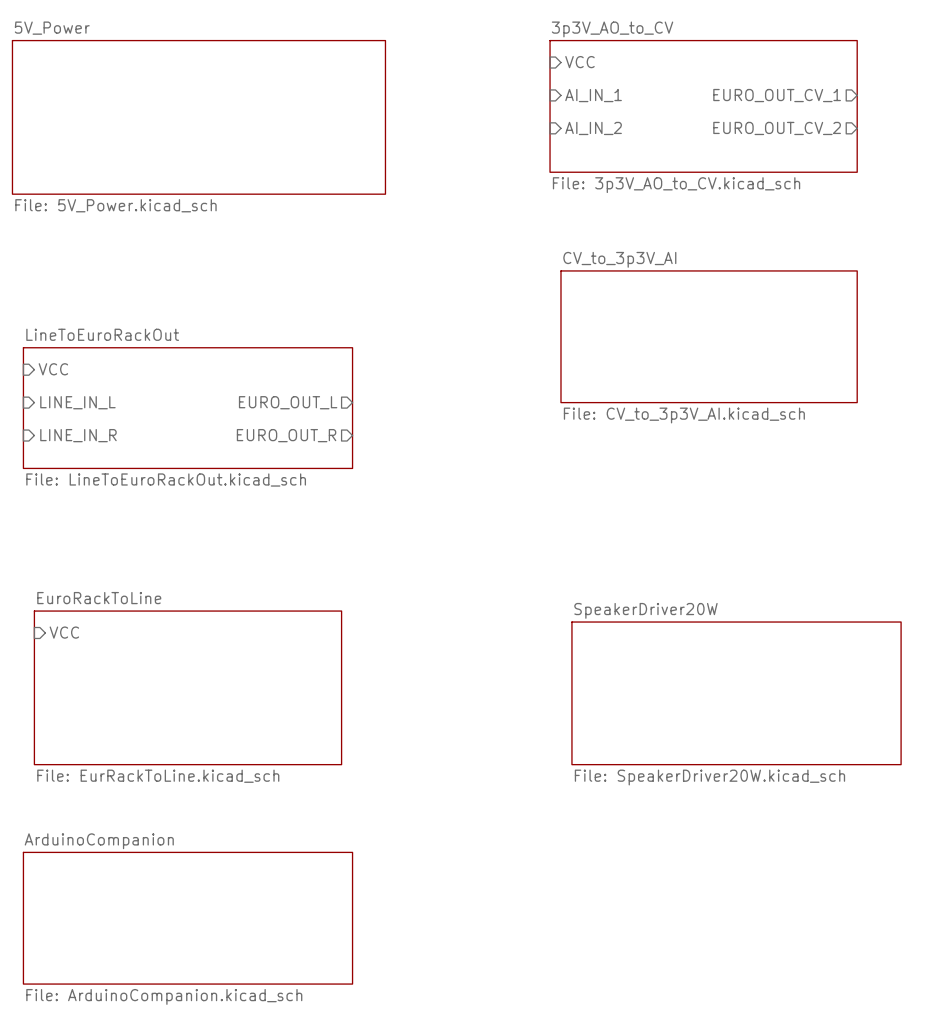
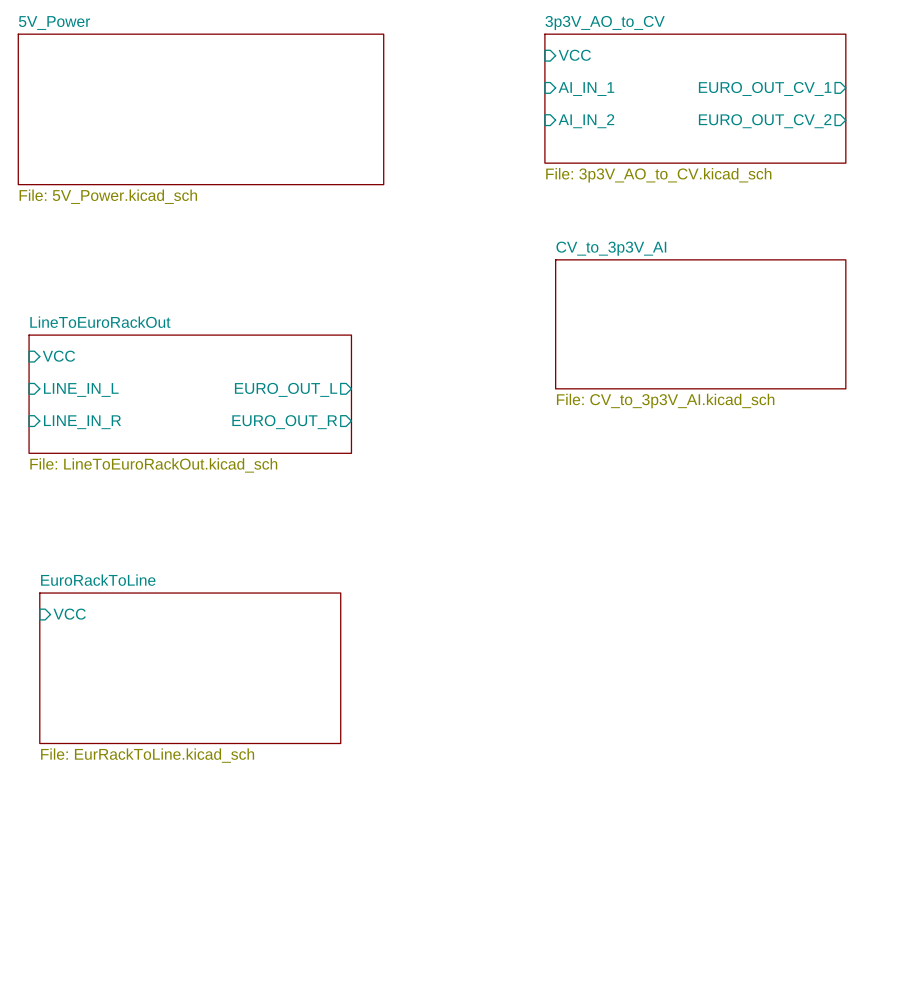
sheet SpeakerDriver20W: File: SpeakerDriver20W.kicad_sch (736, 693) -> none
sheet ArduinoCompanion: File: ArduinoCompanion.kicad_sch (187, 918) -> none

